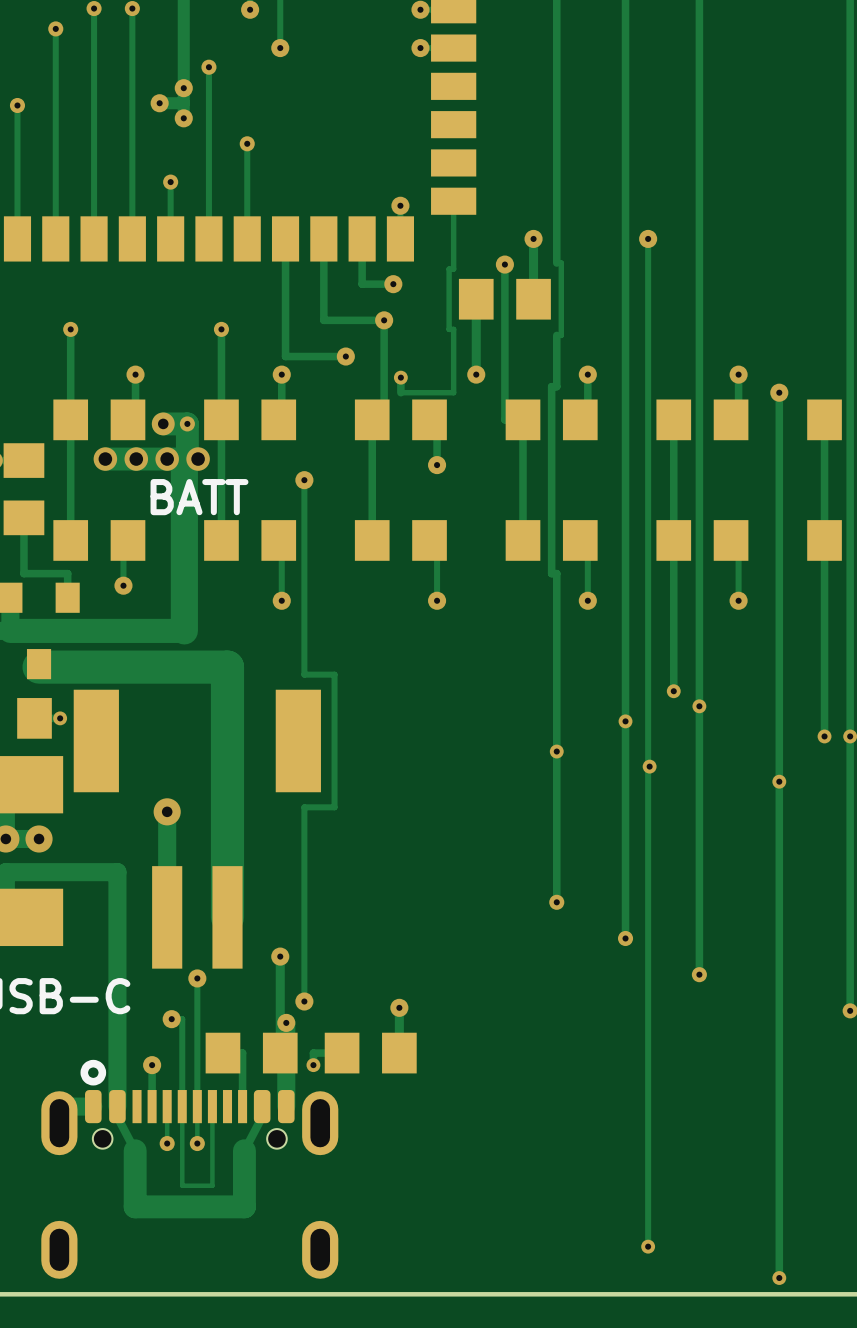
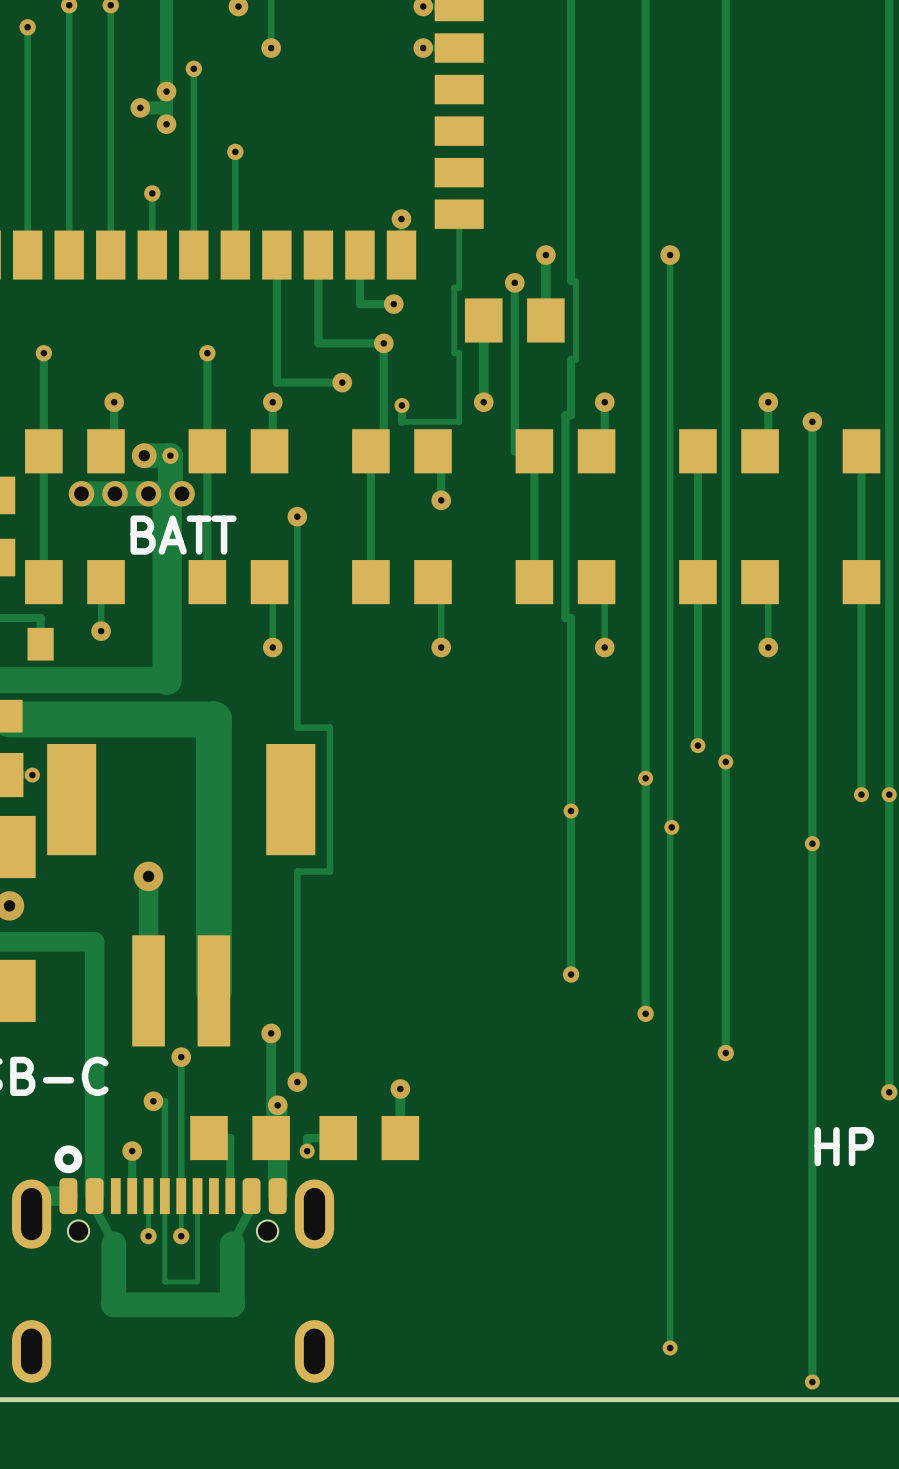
text: none -> HP (844, 1146)

